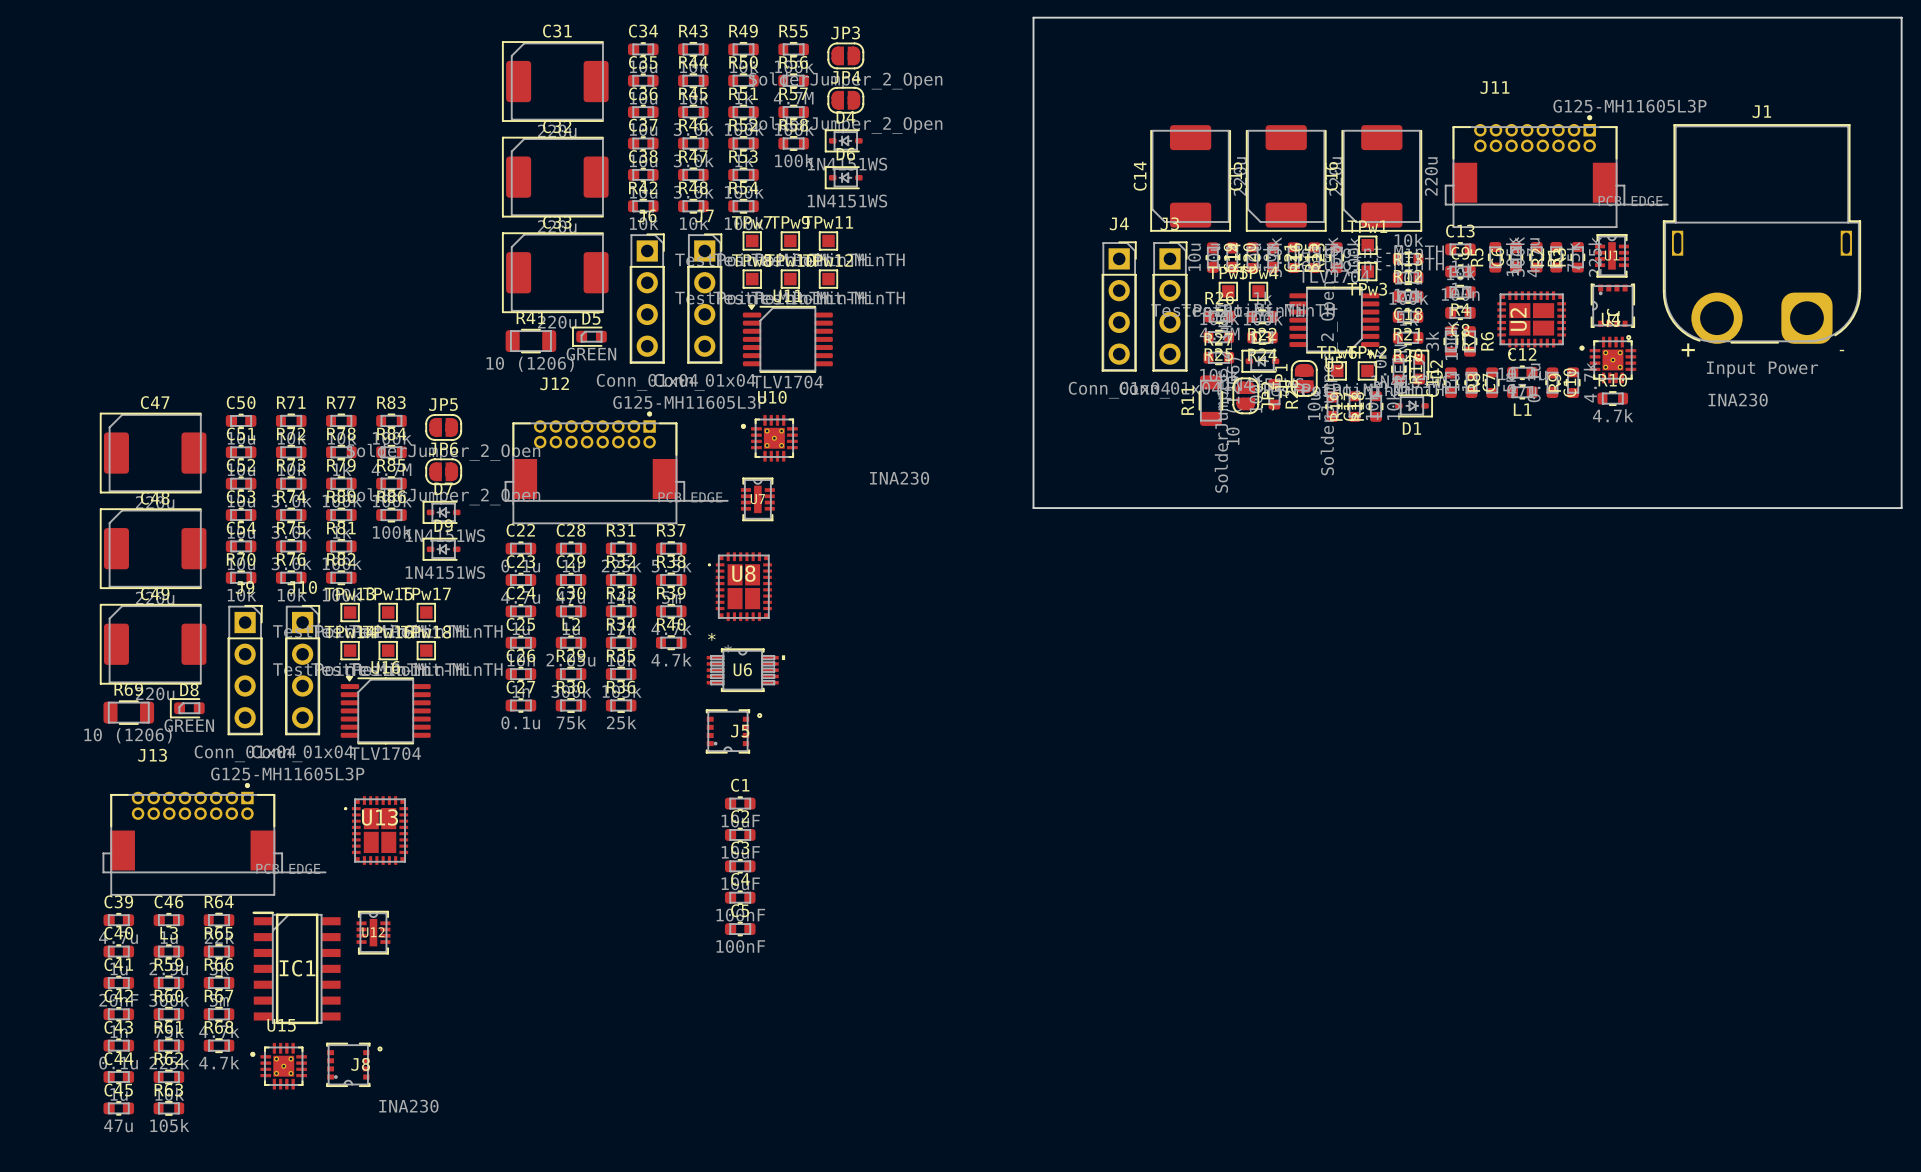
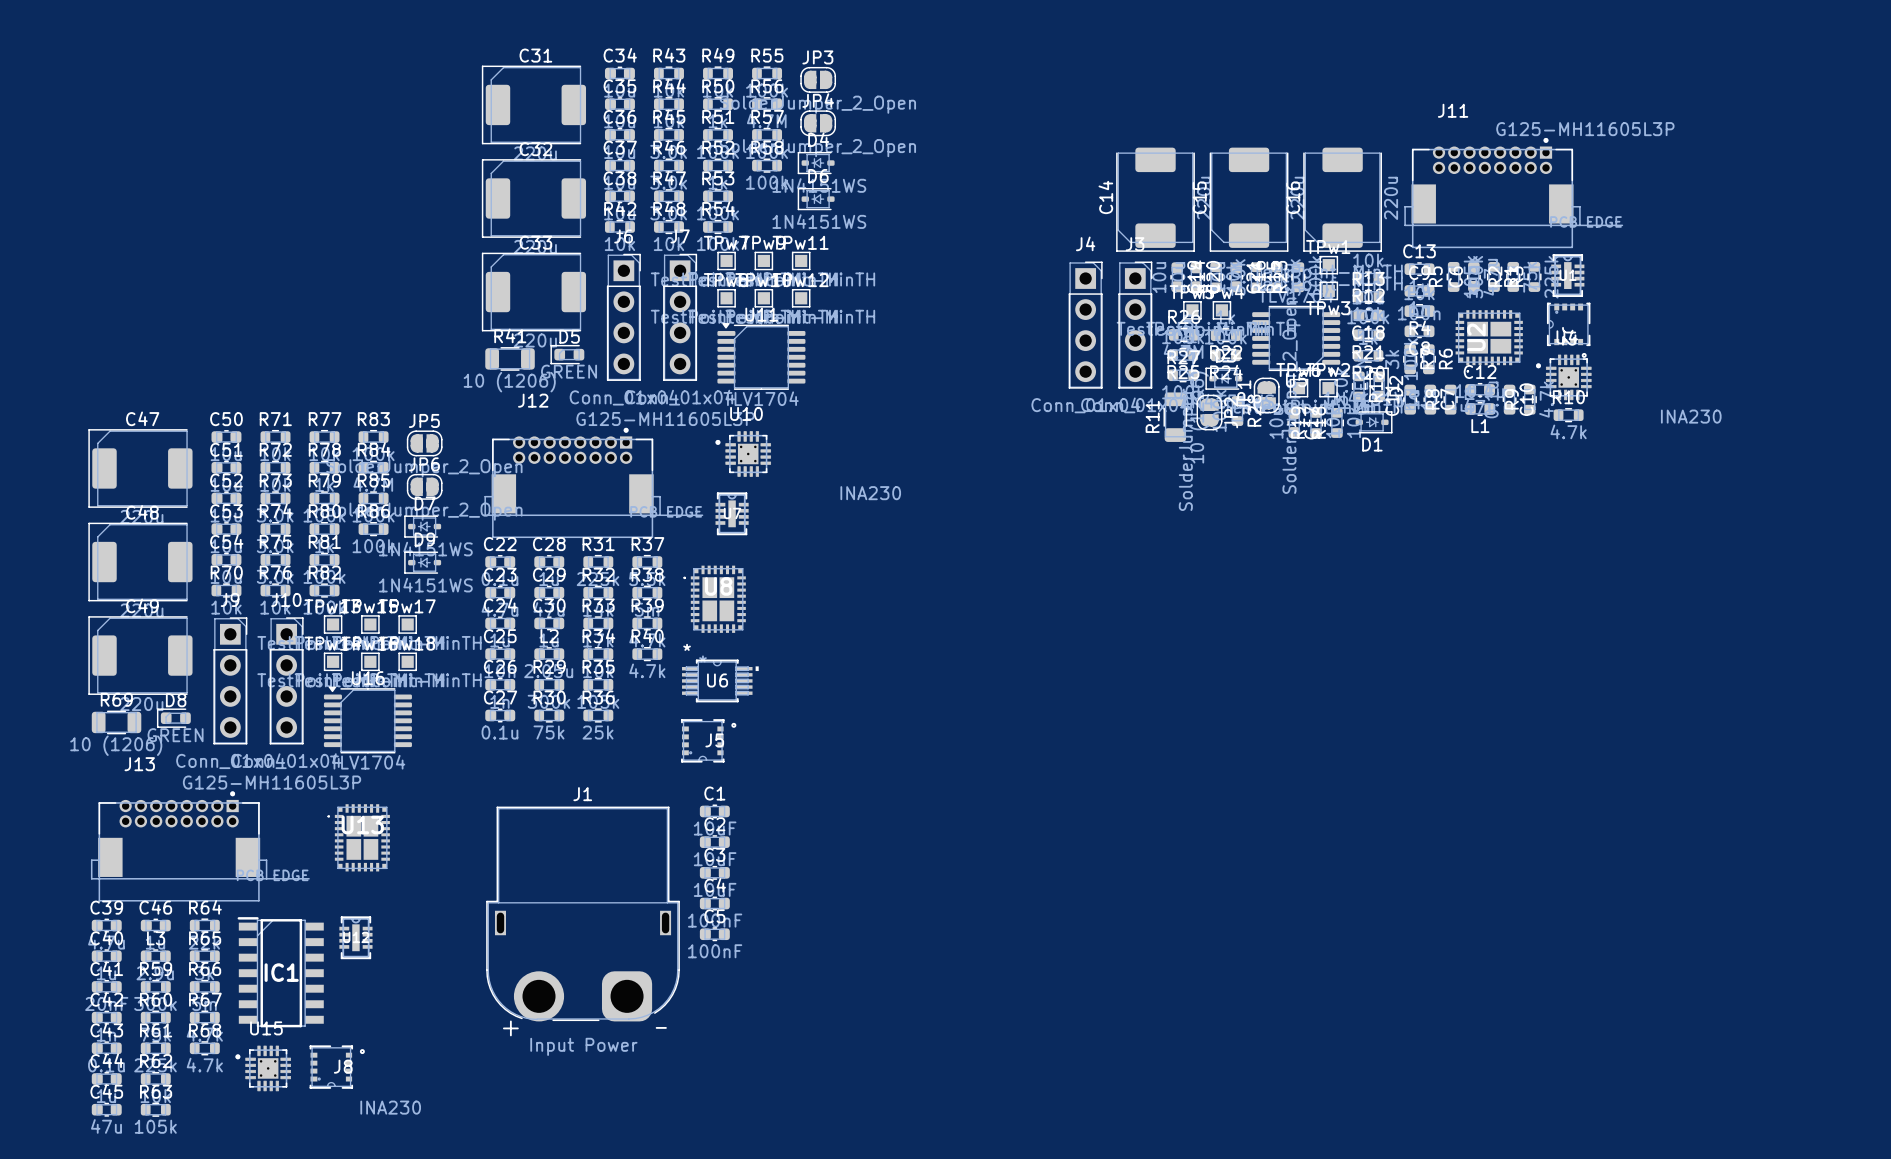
board edge: (1033, 17) (1901, 17) (1901, 508) (1033, 508) (1033, 17) -> none
J1 position: (1761, 234) -> (583, 914)

